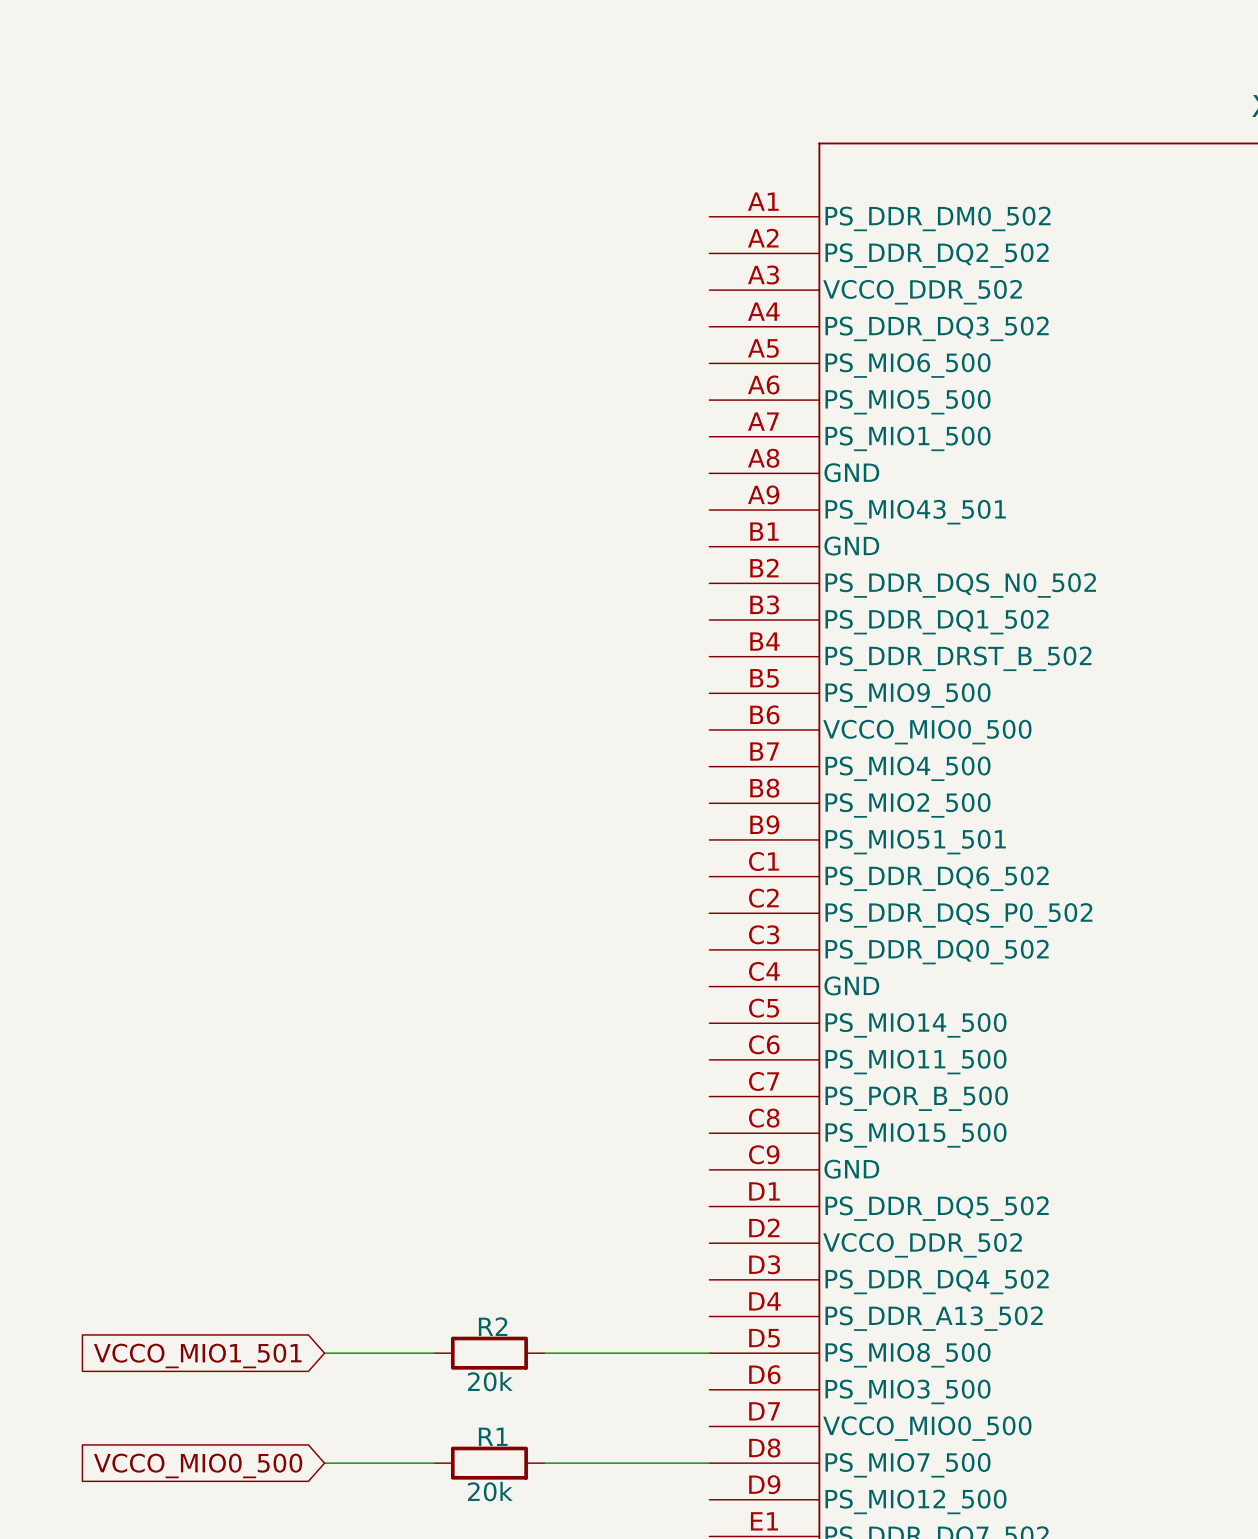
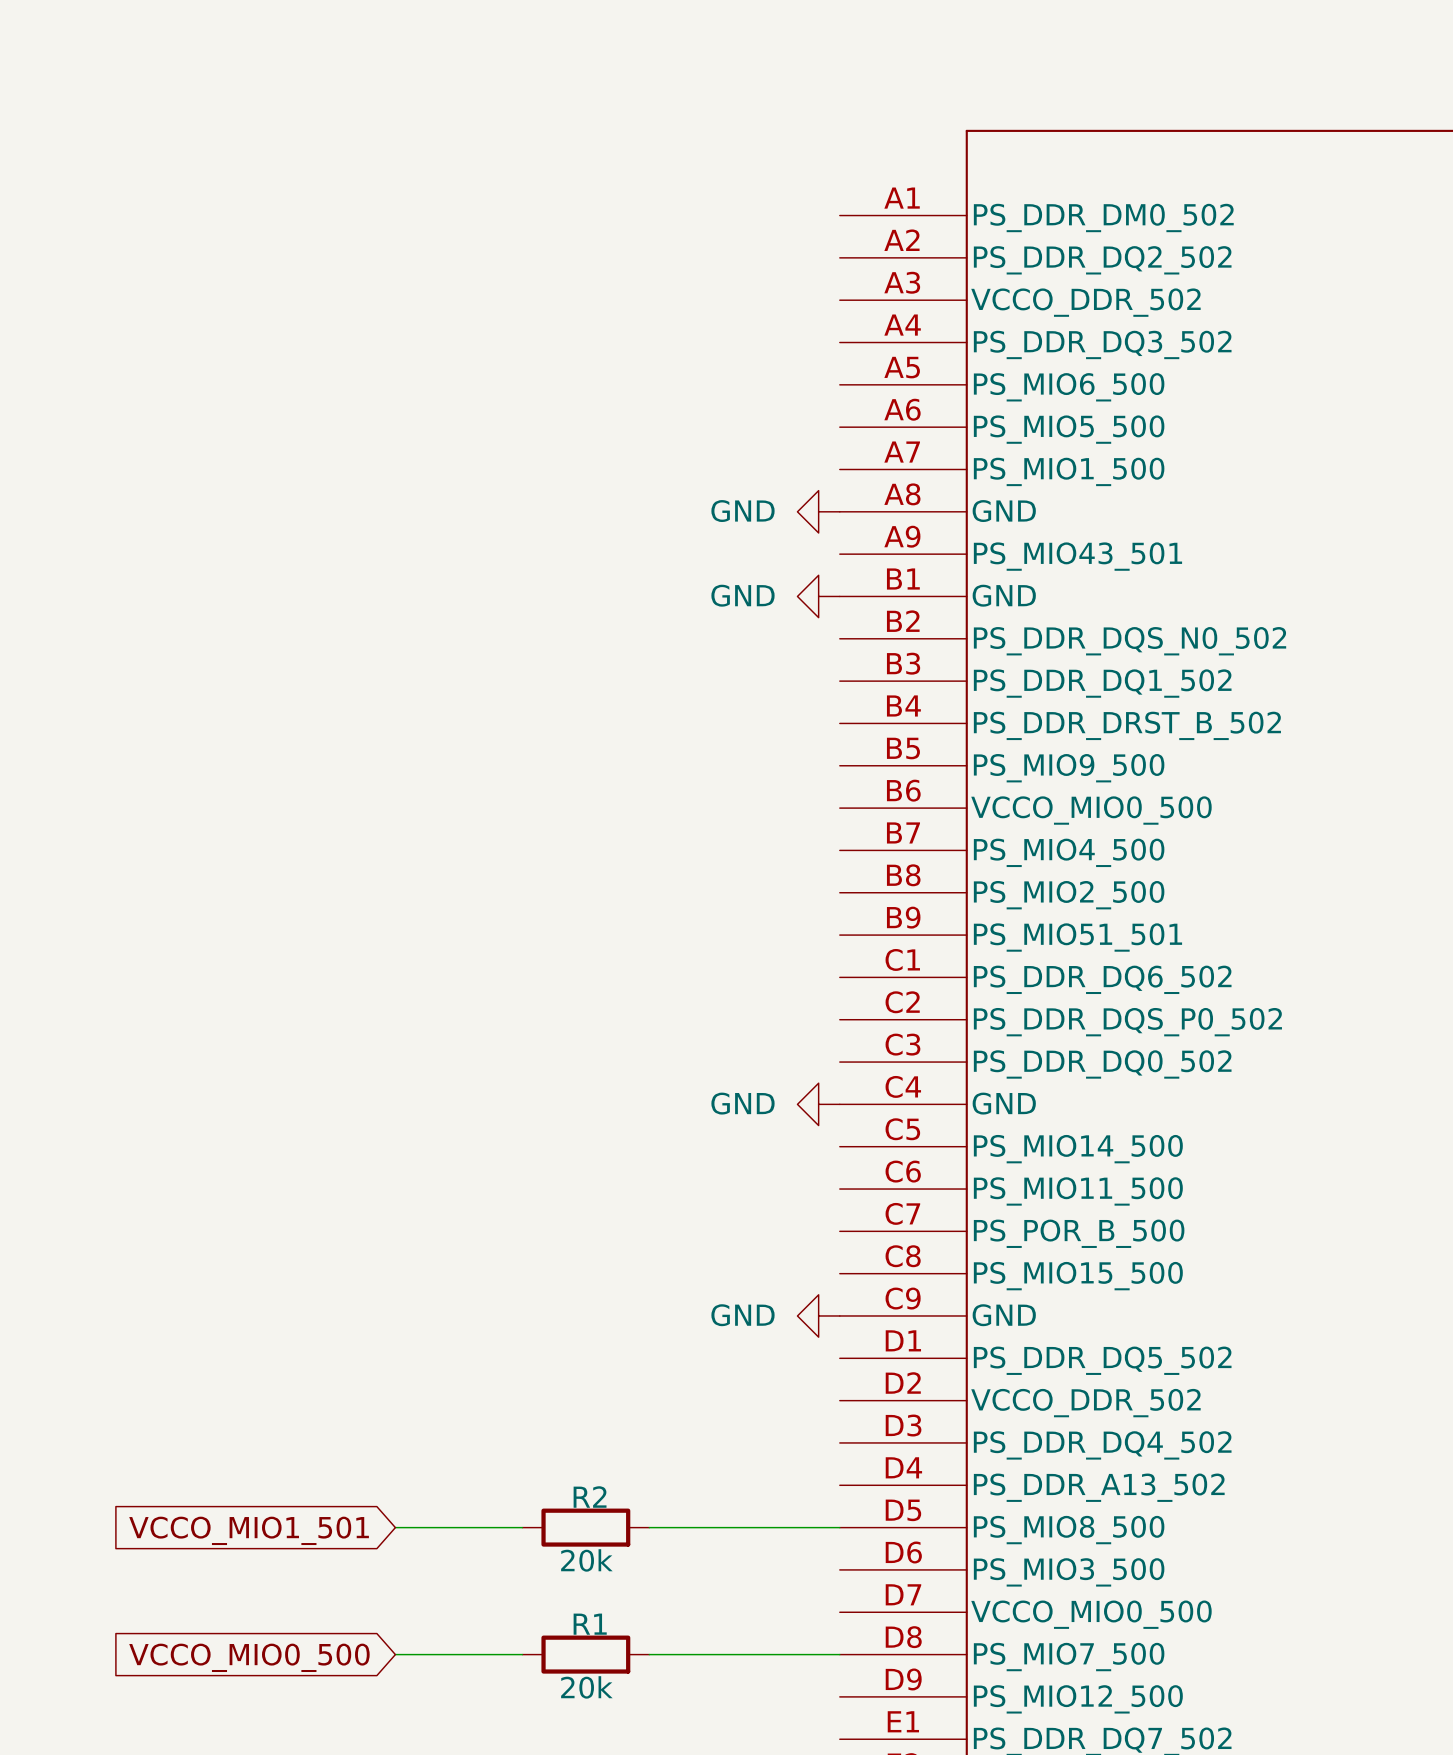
power symbol: none -> GND (818, 511)
power symbol: none -> GND (818, 596)
power symbol: none -> GND (818, 1104)
power symbol: none -> GND (818, 1315)

